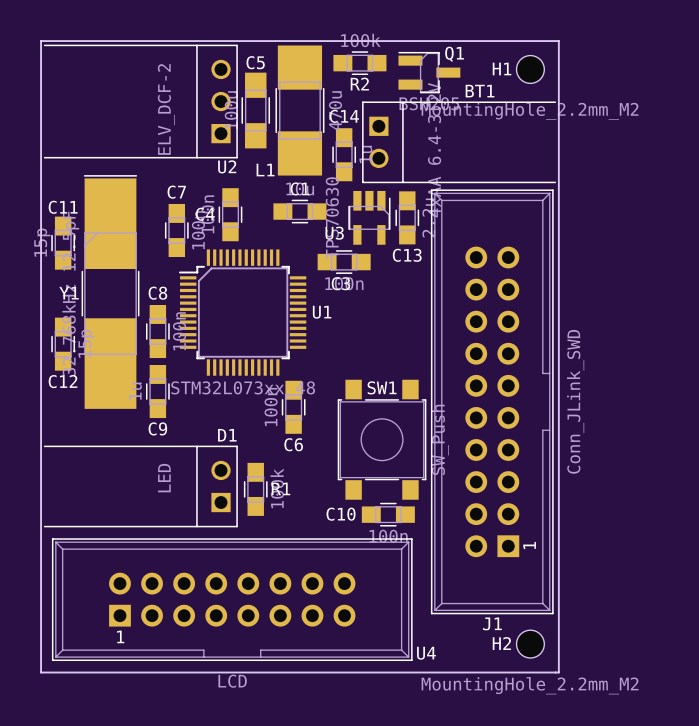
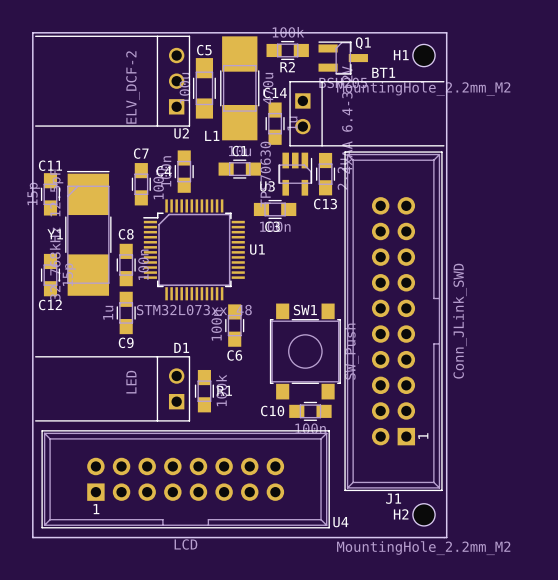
Y1 footprint: [81, 175, 140, 409] -> [65, 171, 112, 296]

